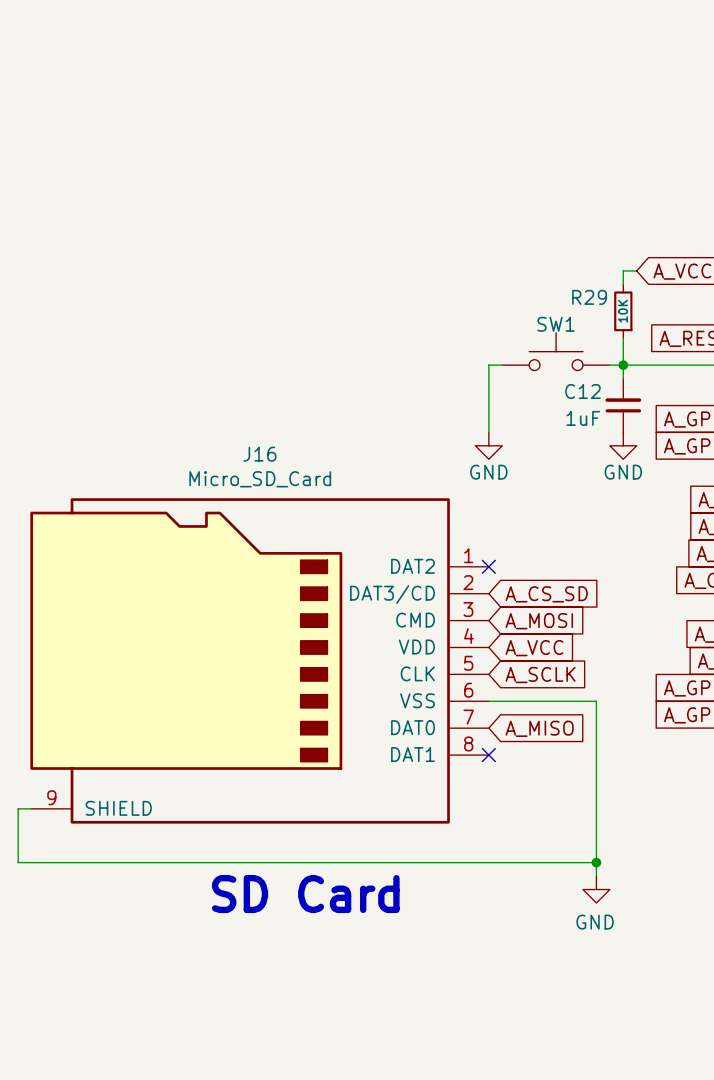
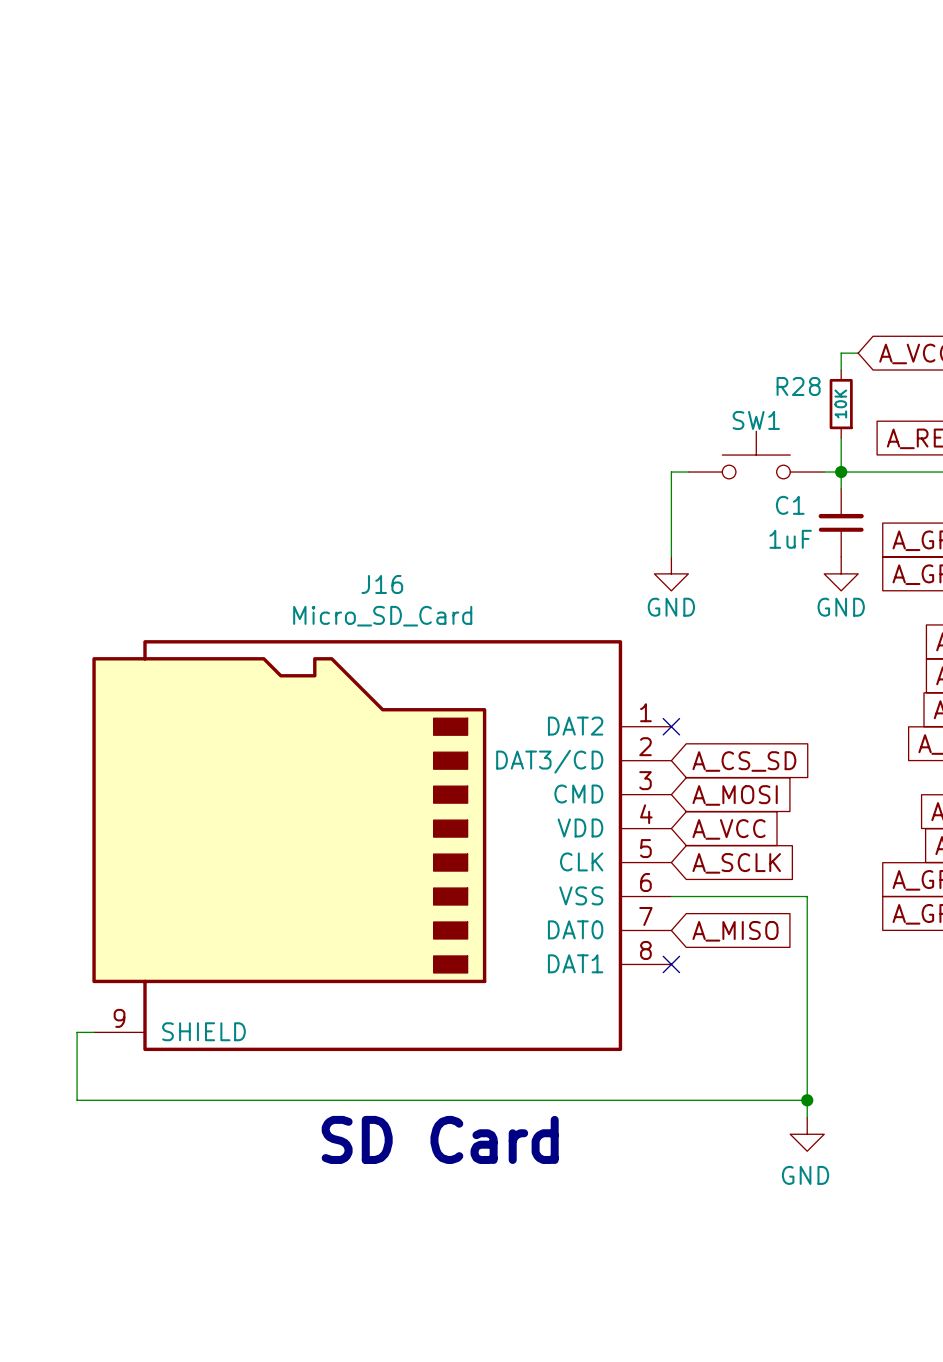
R29 name: R29 (589, 297) -> R28 (798, 386)
C12 name: C12 (582, 391) -> C1 (790, 505)

